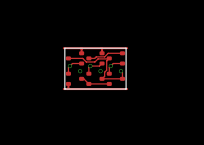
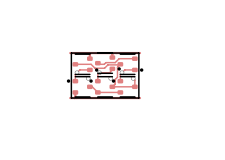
part footprint: [65, 51, 85, 66] -> [72, 53, 99, 76]
part footprint: [86, 51, 105, 66] -> [94, 52, 121, 74]
part footprint: [106, 51, 126, 66] -> [117, 53, 144, 76]
part footprint: [65, 71, 85, 86] -> [66, 76, 93, 98]
part footprint: [86, 71, 105, 86] -> [89, 76, 116, 98]
part footprint: [106, 71, 126, 86] -> [111, 76, 138, 98]

